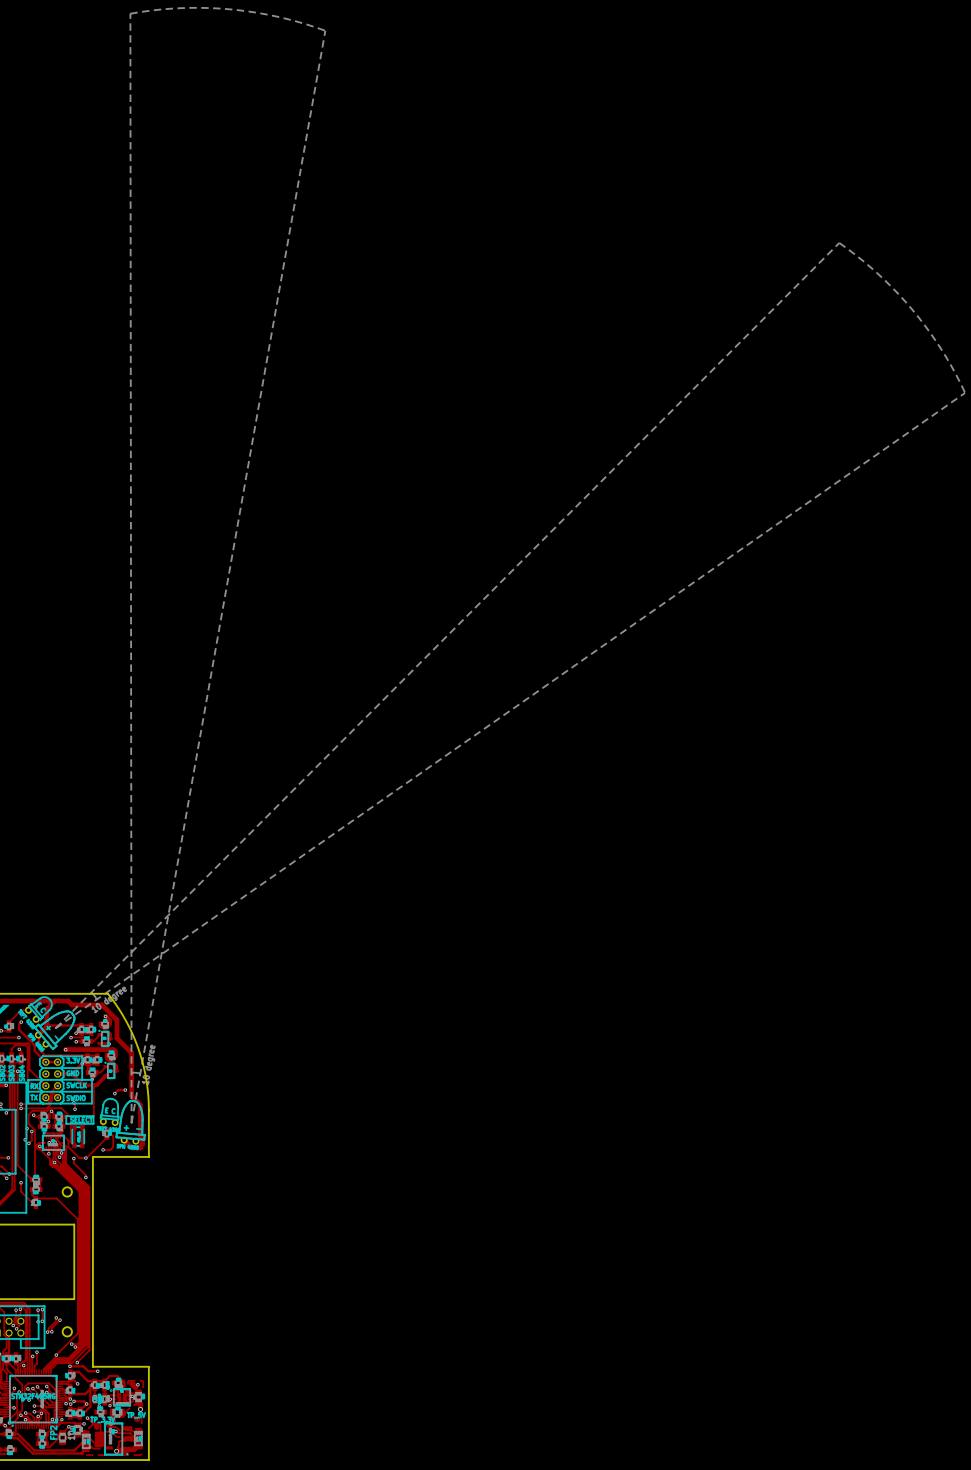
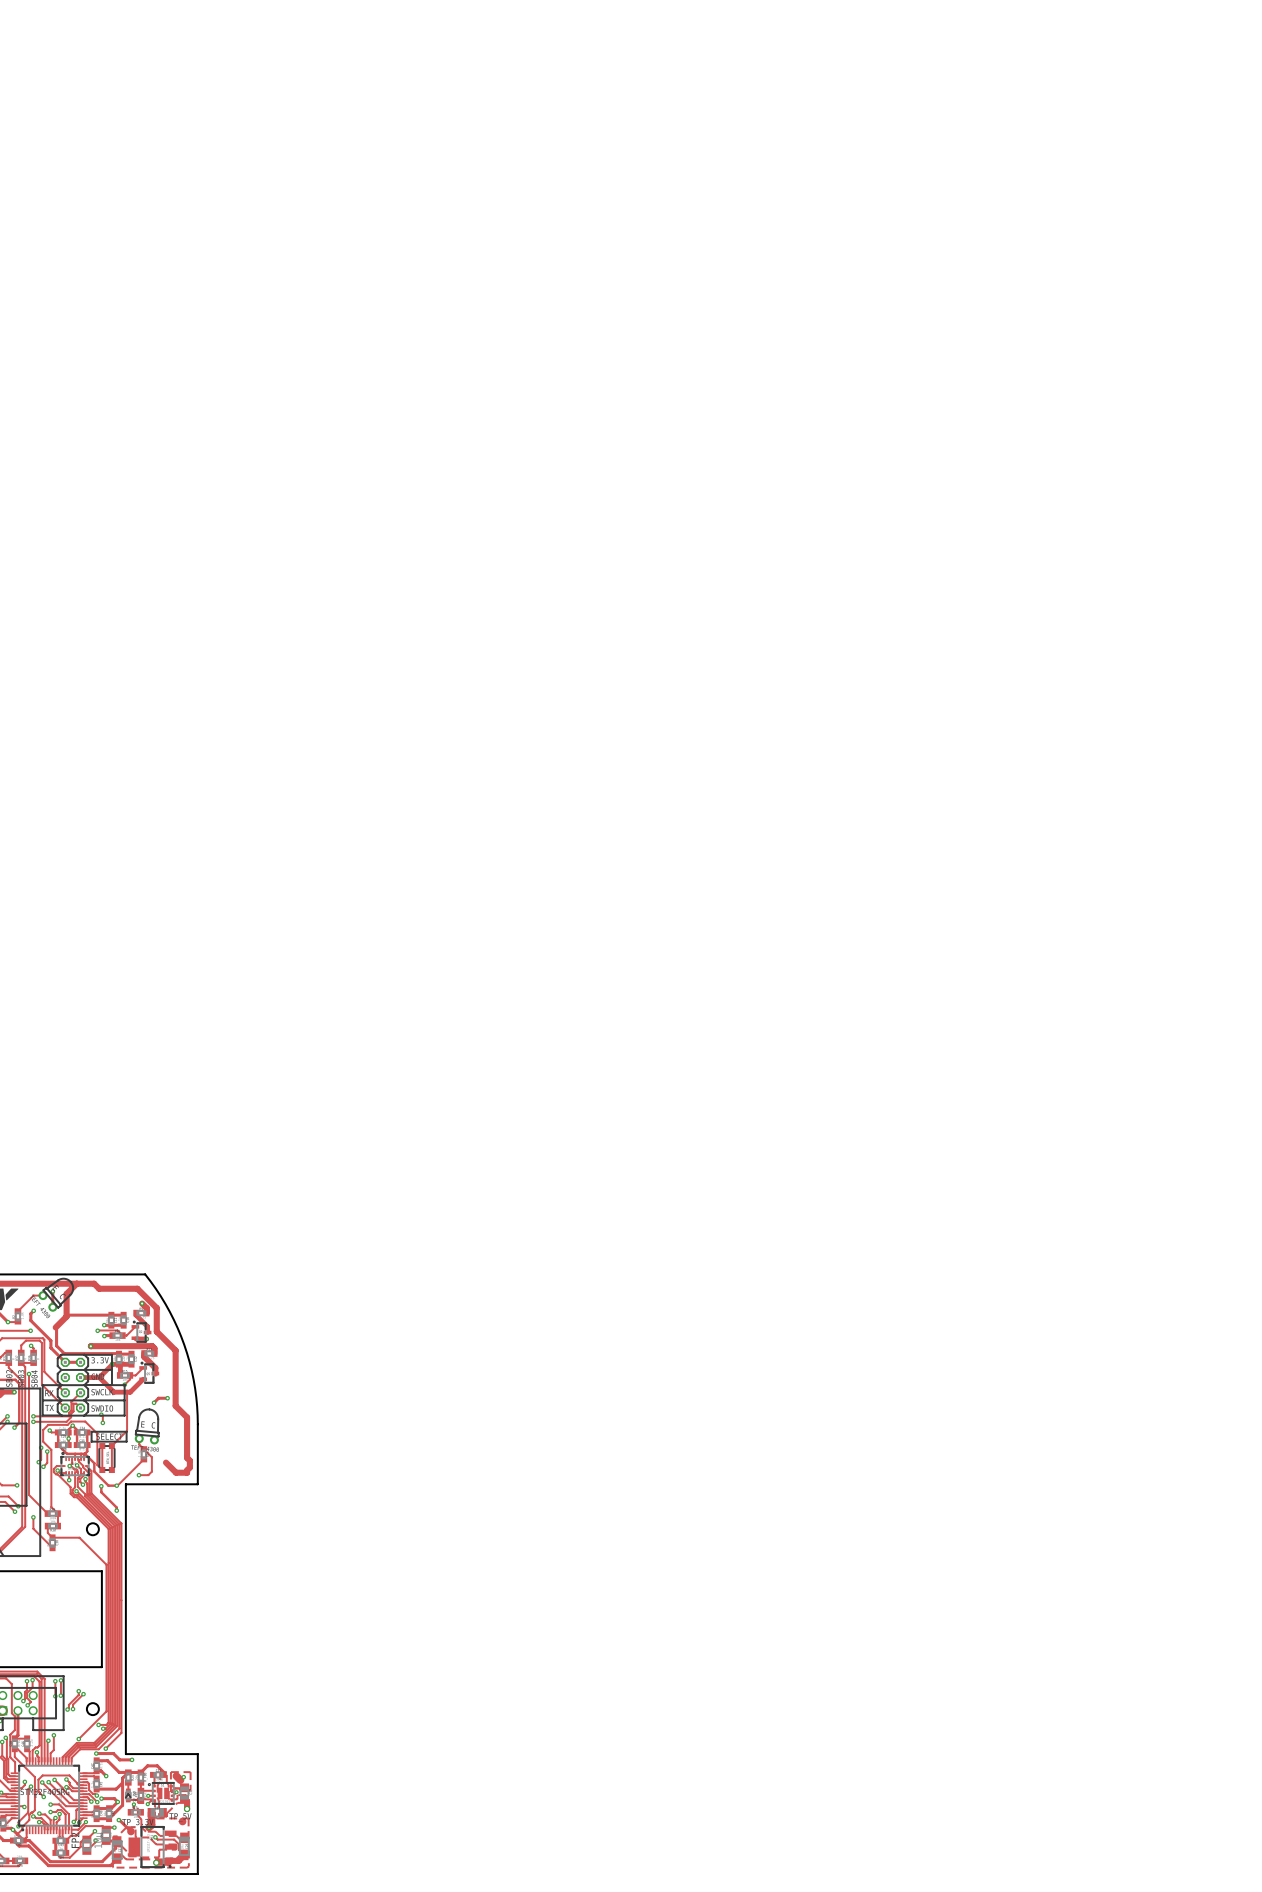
part: (220, 576) -> none
part: (500, 645) -> none

